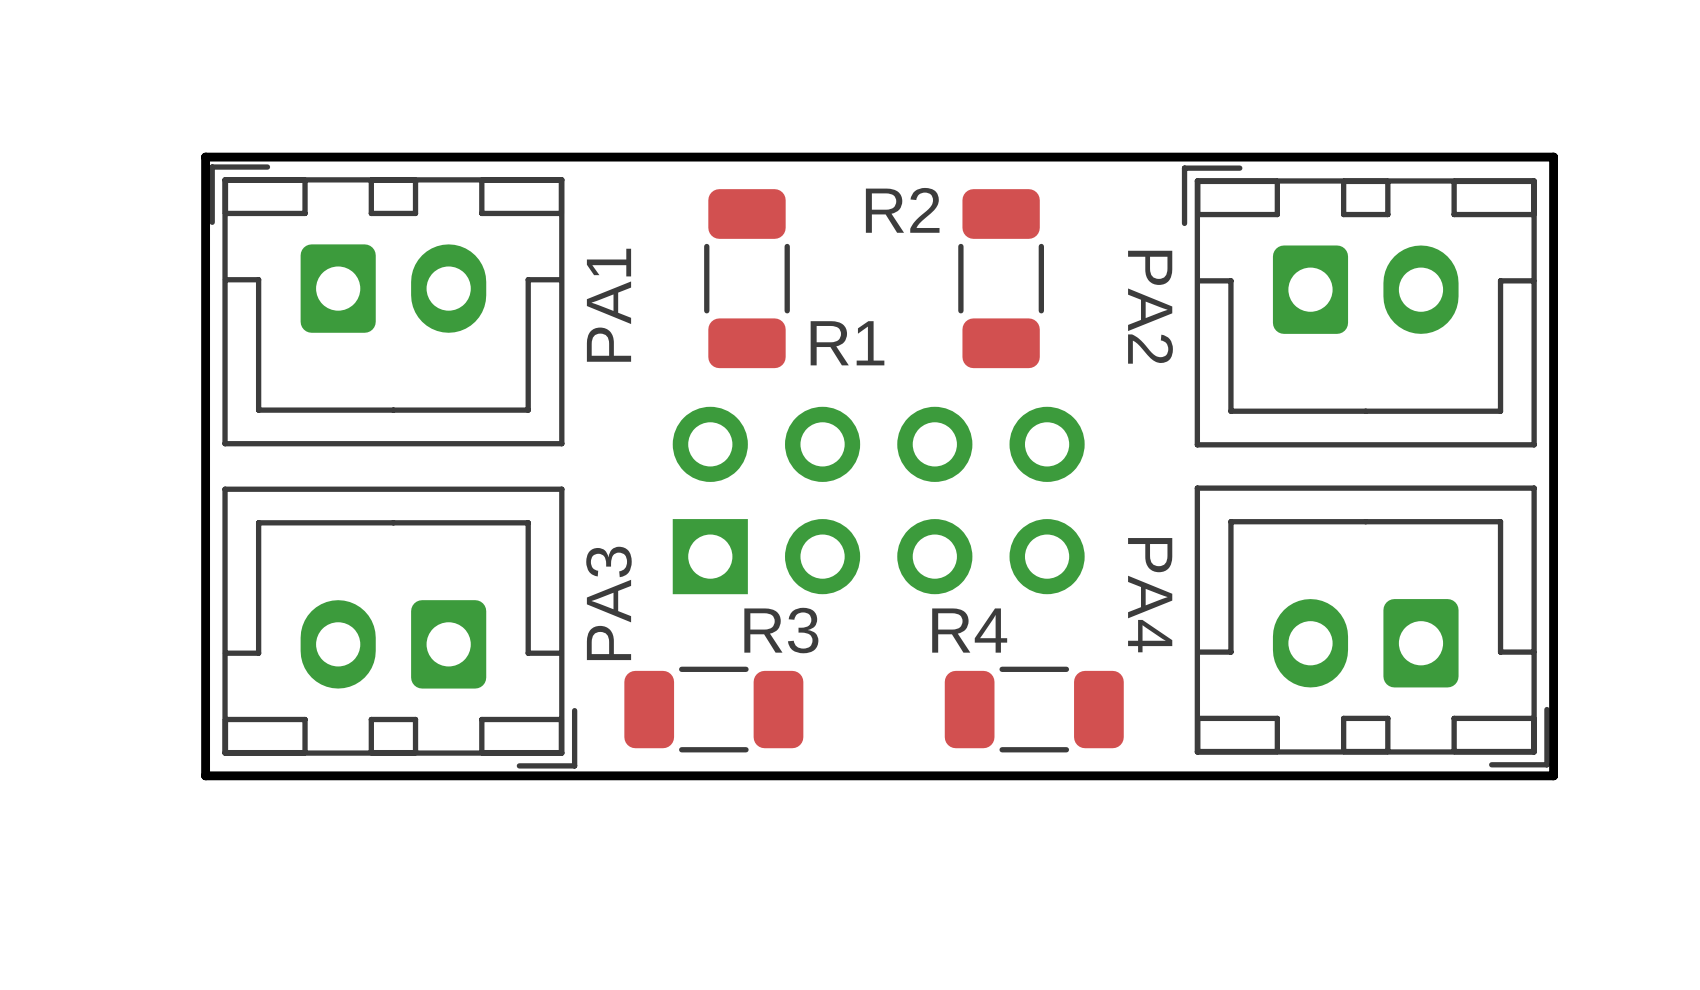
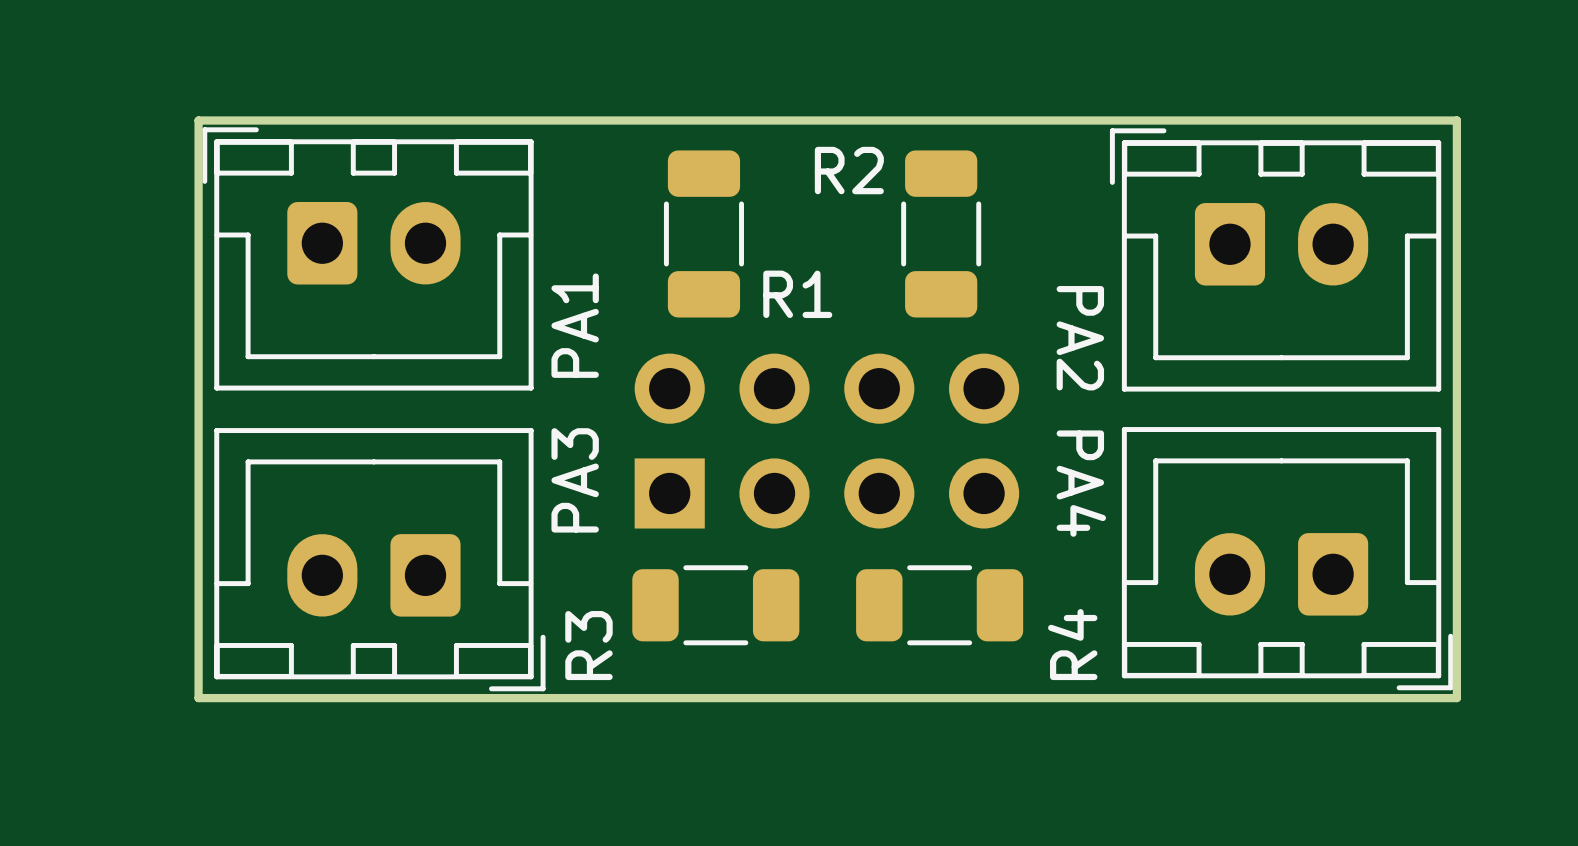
text position: PA1 (608, 305) -> PA1 (575, 325)
text position: PA2 (1150, 307) -> PA2 (1080, 338)
text position: PA4 (1150, 595) -> PA4 (1081, 483)
text position: PA3 (608, 603) -> PA3 (575, 480)
R3 name rotation: 0° (781, 630) -> 90° counterclockwise (588, 645)
R3 name position: R3 (781, 630) -> R3 (588, 645)
R4 name rotation: 0° (969, 630) -> 90° counterclockwise (1072, 644)
R4 name position: R4 (969, 630) -> R4 (1072, 644)
R3 position: (713, 709) -> (715, 605)
R4 position: (1034, 709) -> (939, 605)

